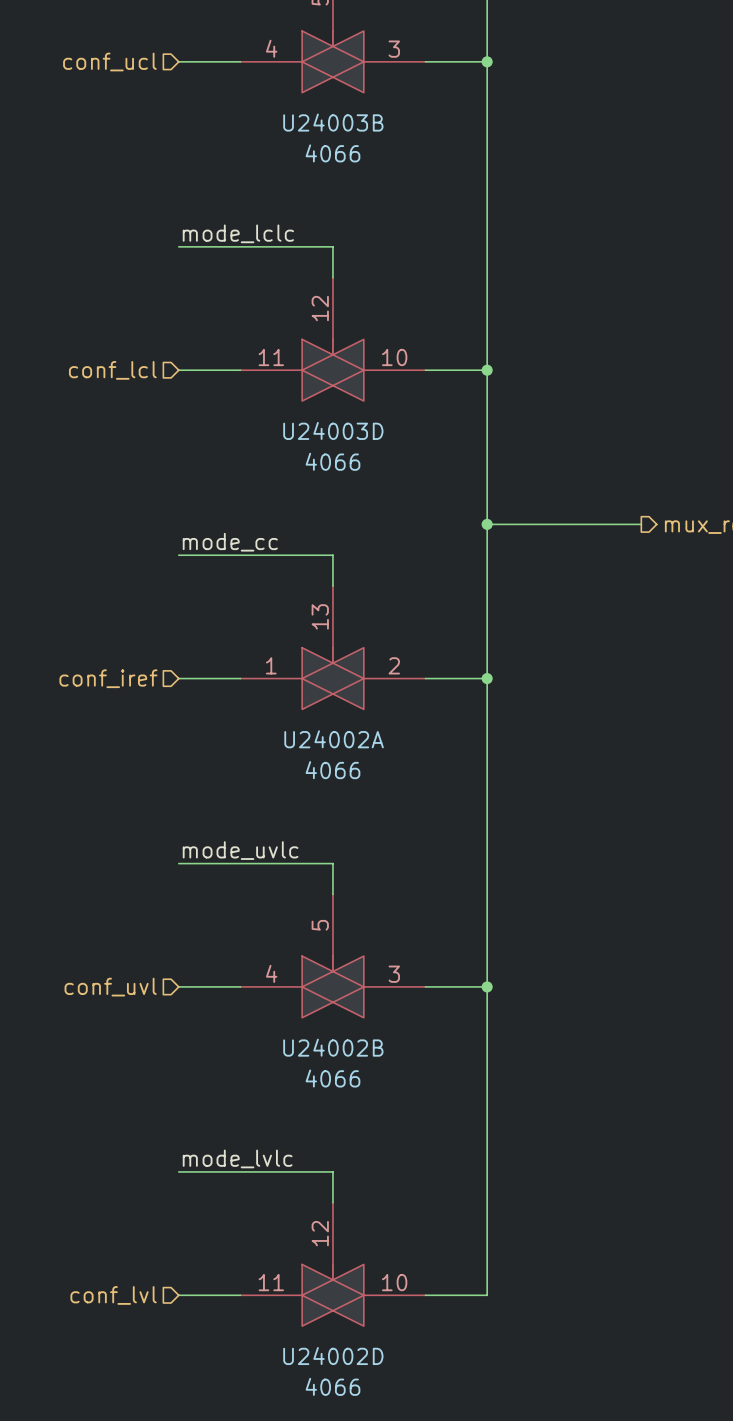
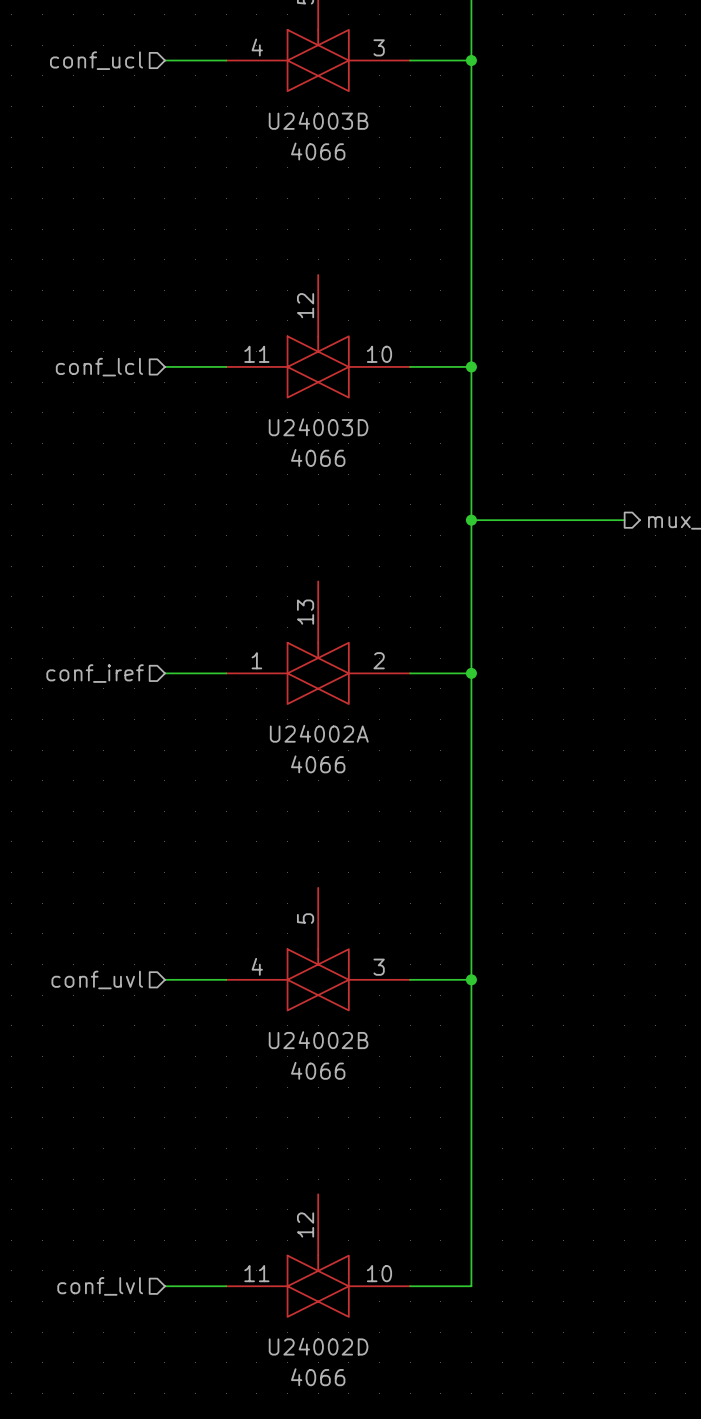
label: mode_lclc (238, 233) -> none
wire: (178, 246) (332, 246) (332, 277) -> none
label: mode_cc (230, 542) -> none
wire: (178, 555) (332, 555) (332, 586) -> none
label: mode_uvlc (240, 850) -> none
wire: (178, 863) (332, 863) (332, 894) -> none
label: mode_lvlc (237, 1158) -> none
wire: (178, 1171) (332, 1171) (332, 1202) -> none

